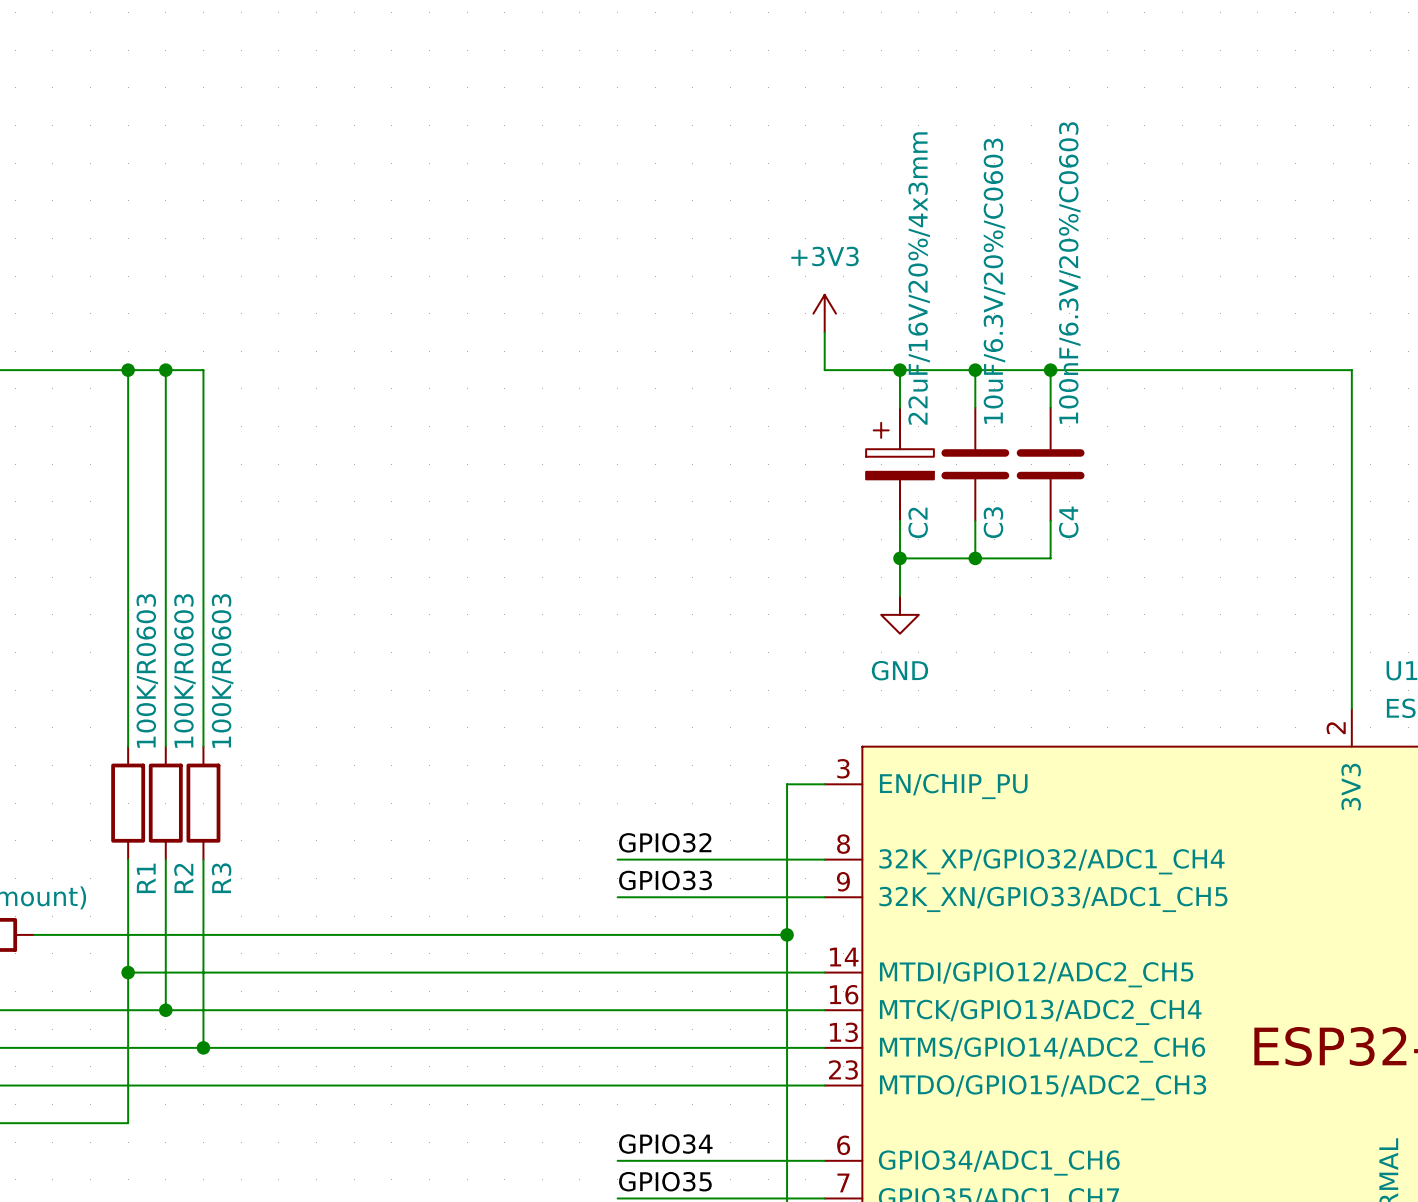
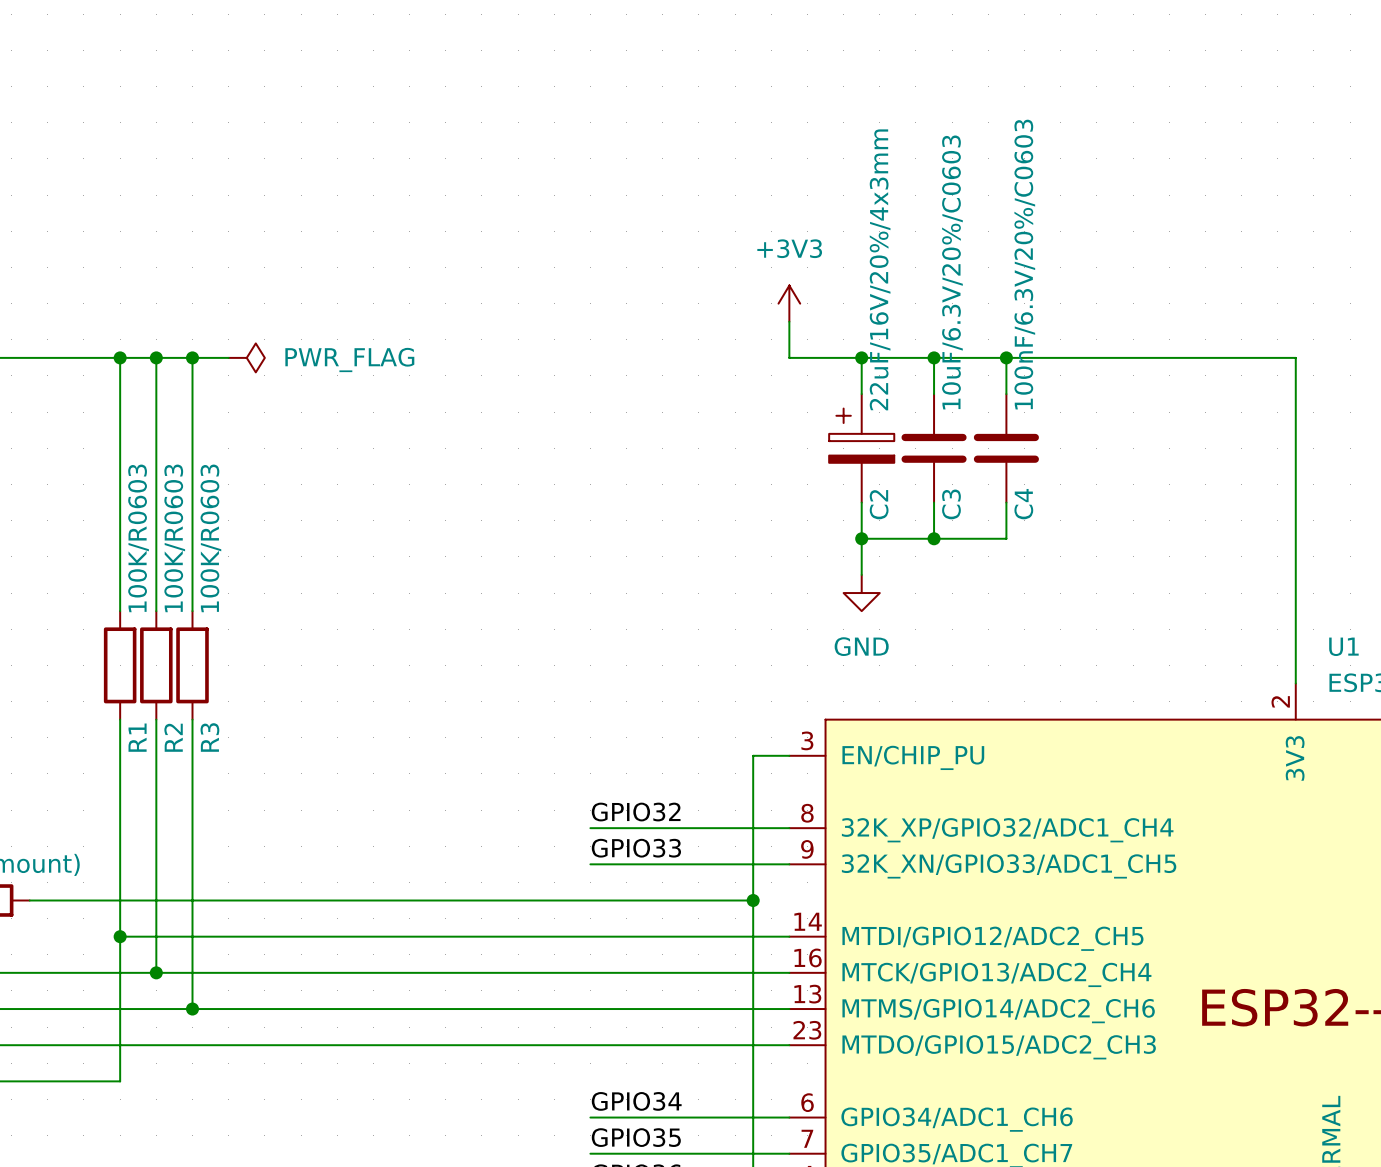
wire: none -> (192, 357) (228, 357)
junction: none -> (192, 357)
power symbol: none -> PWR_FLAG (246, 357)
wire: (128, 633) (128, 746) -> (120, 828) (120, 719)
wire: (165, 633) (165, 746) -> (156, 828) (156, 719)
wire: (203, 633) (203, 746) -> (192, 828) (192, 719)
R1 position: (128, 803) -> (120, 665)
R2 position: (165, 803) -> (156, 665)
R3 position: (203, 803) -> (192, 665)

